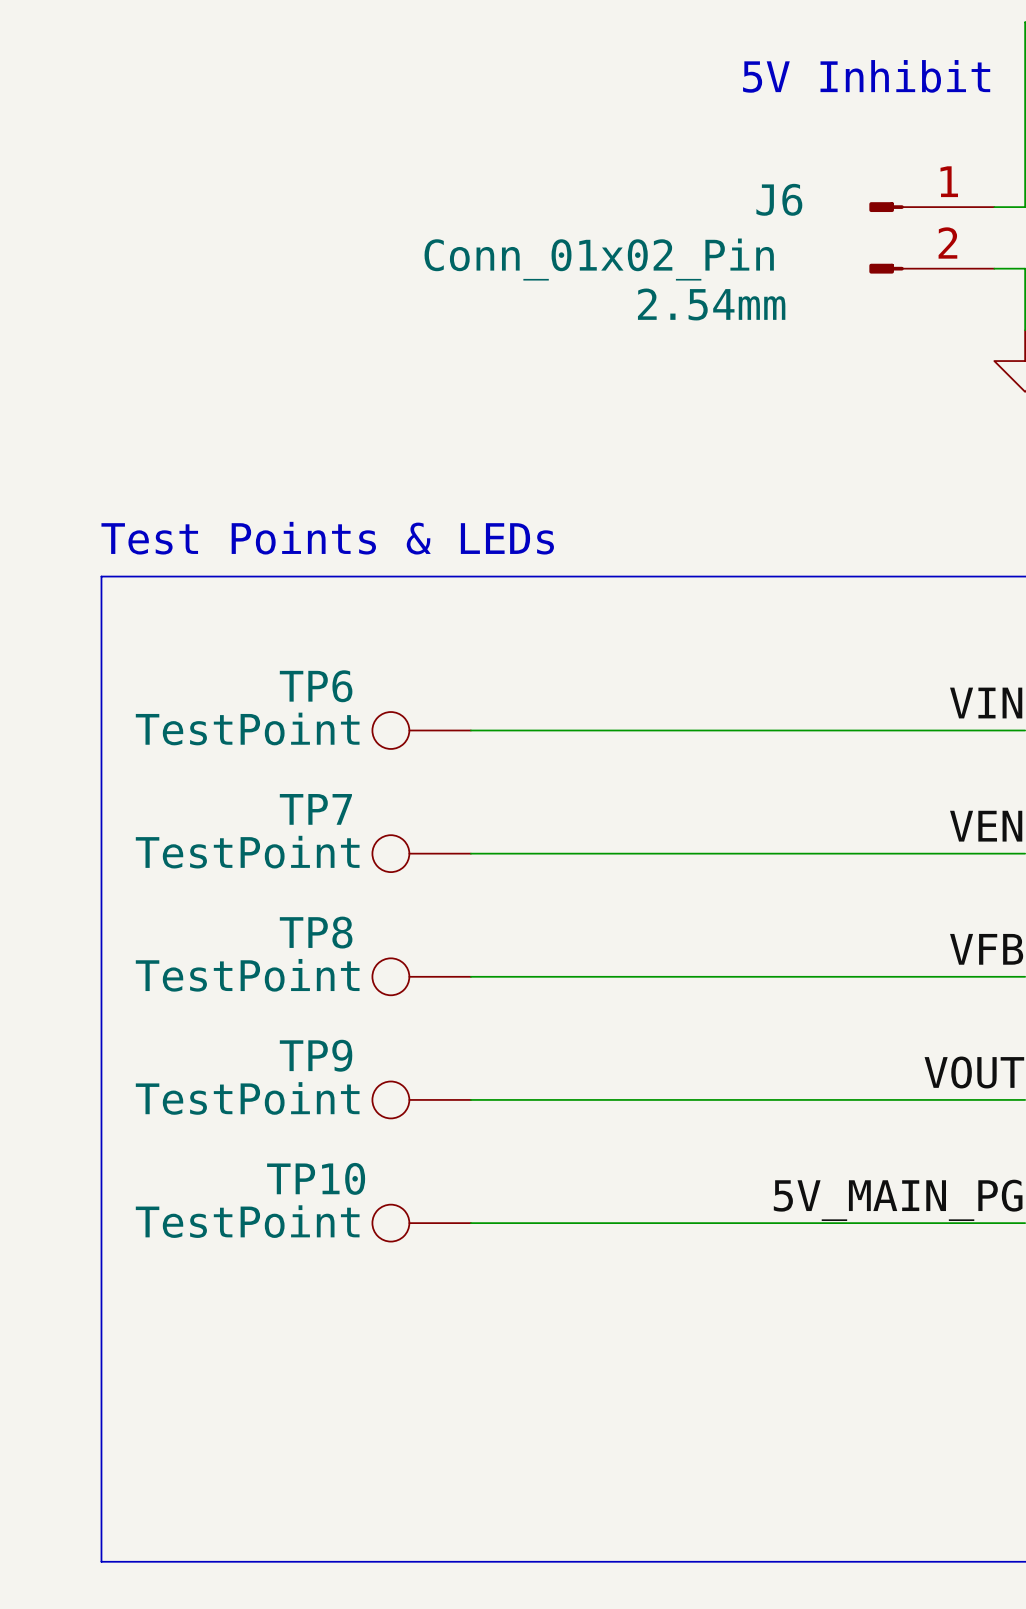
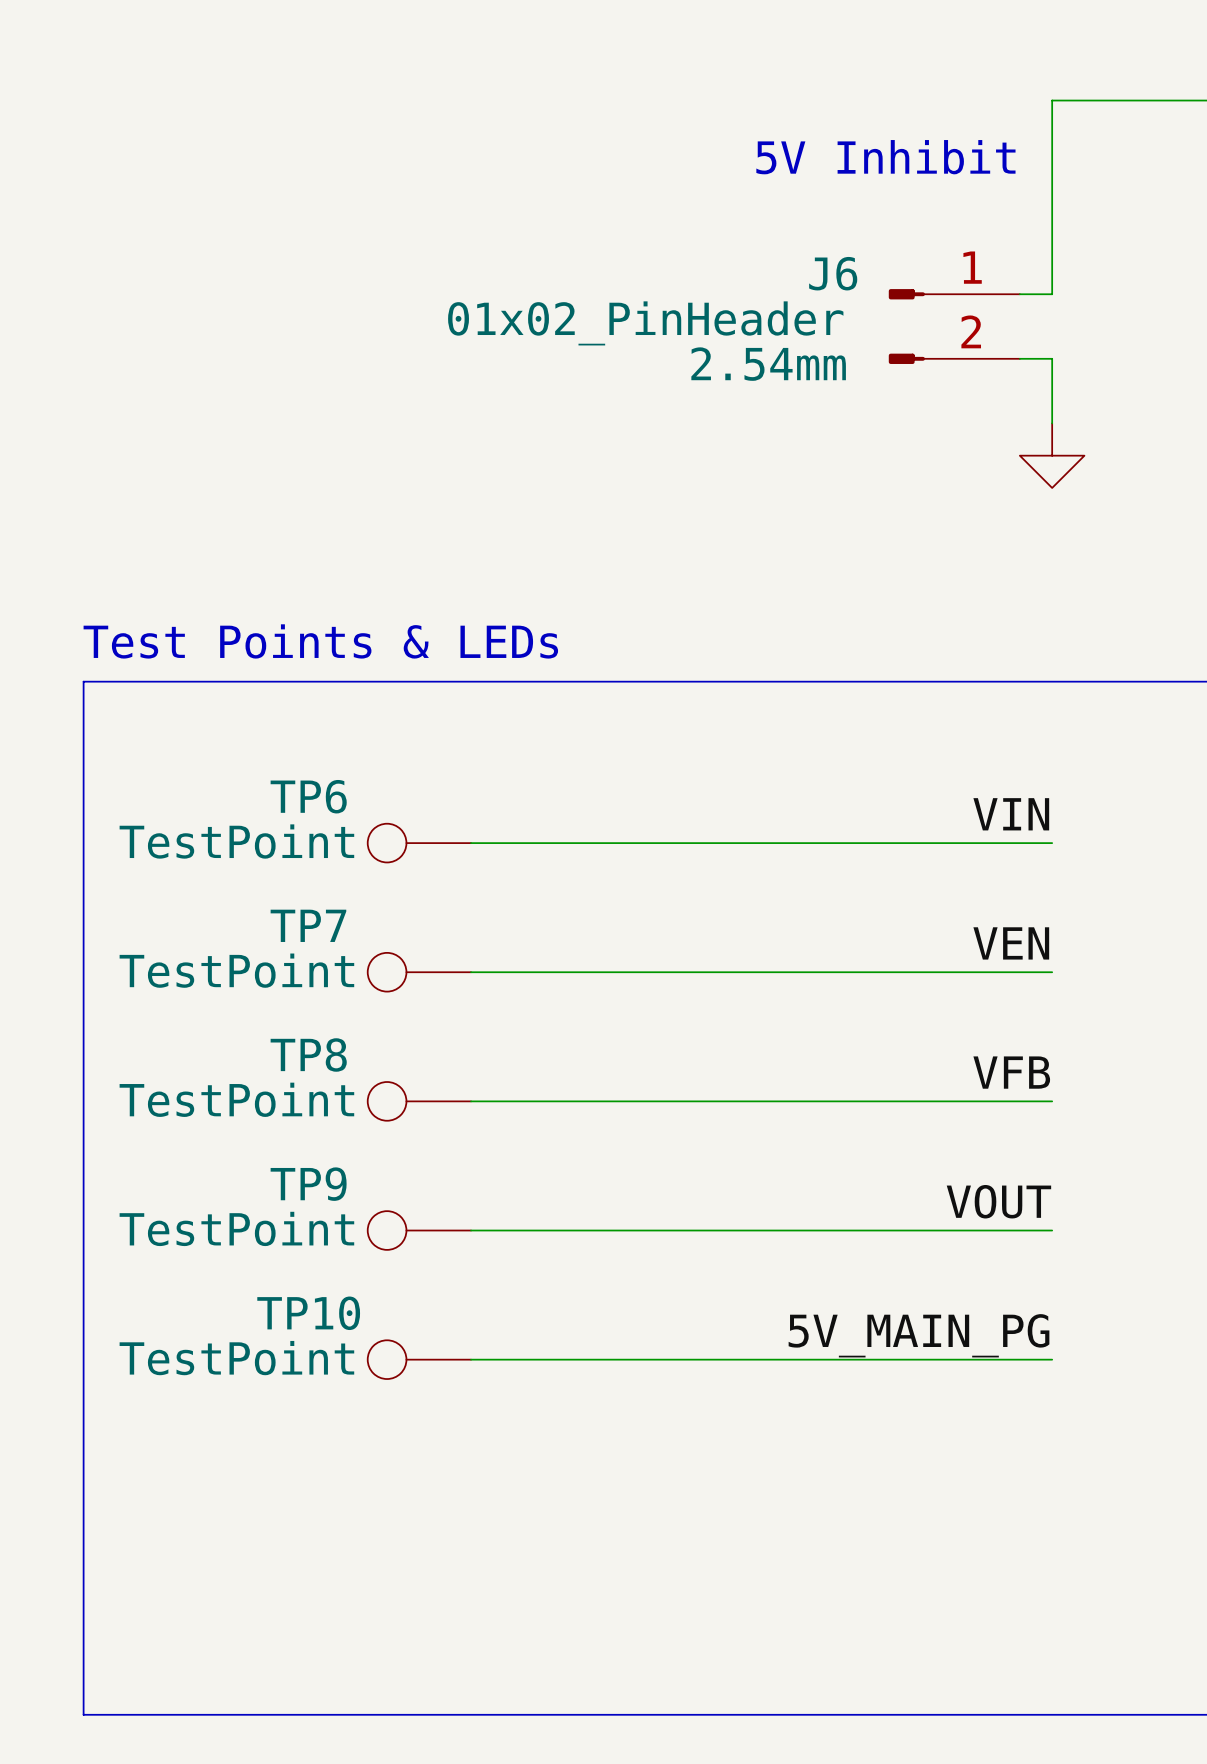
J6 name position: J6 (779, 199) -> J6 (833, 273)
J6 value: Conn_01x02_Pin (599, 259) -> 01x02_PinHeader (645, 323)
J6 text position: 2.54mm (711, 304) -> 2.54mm (768, 364)

